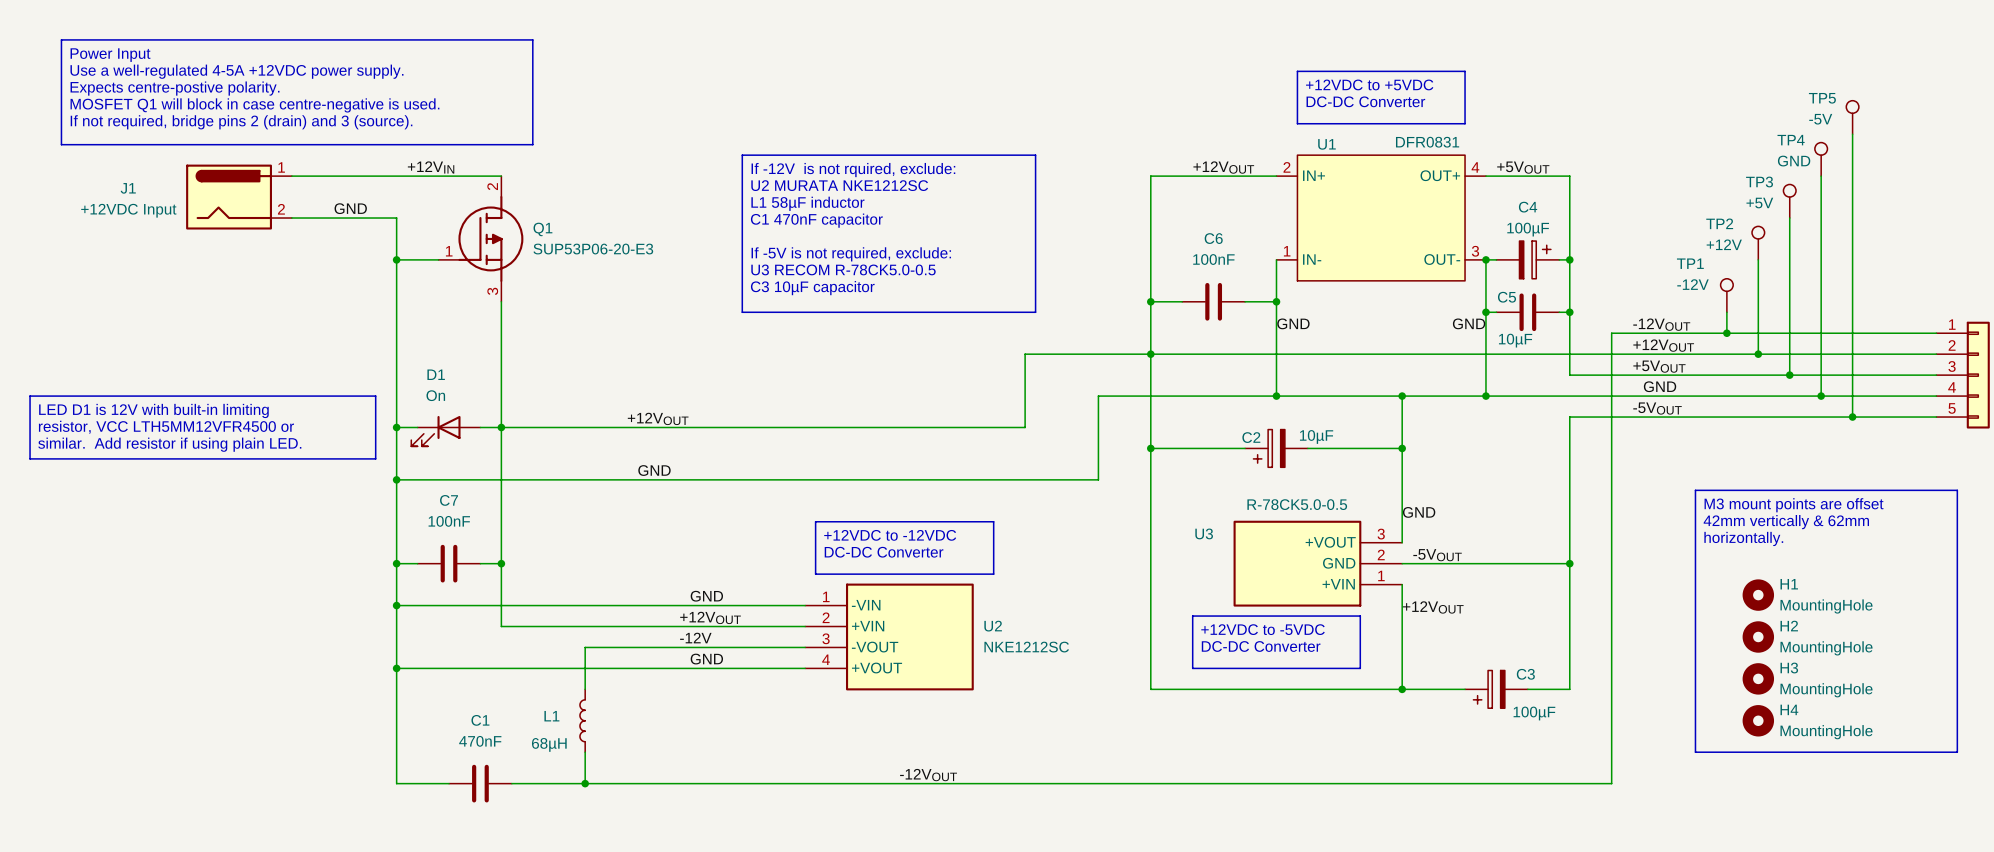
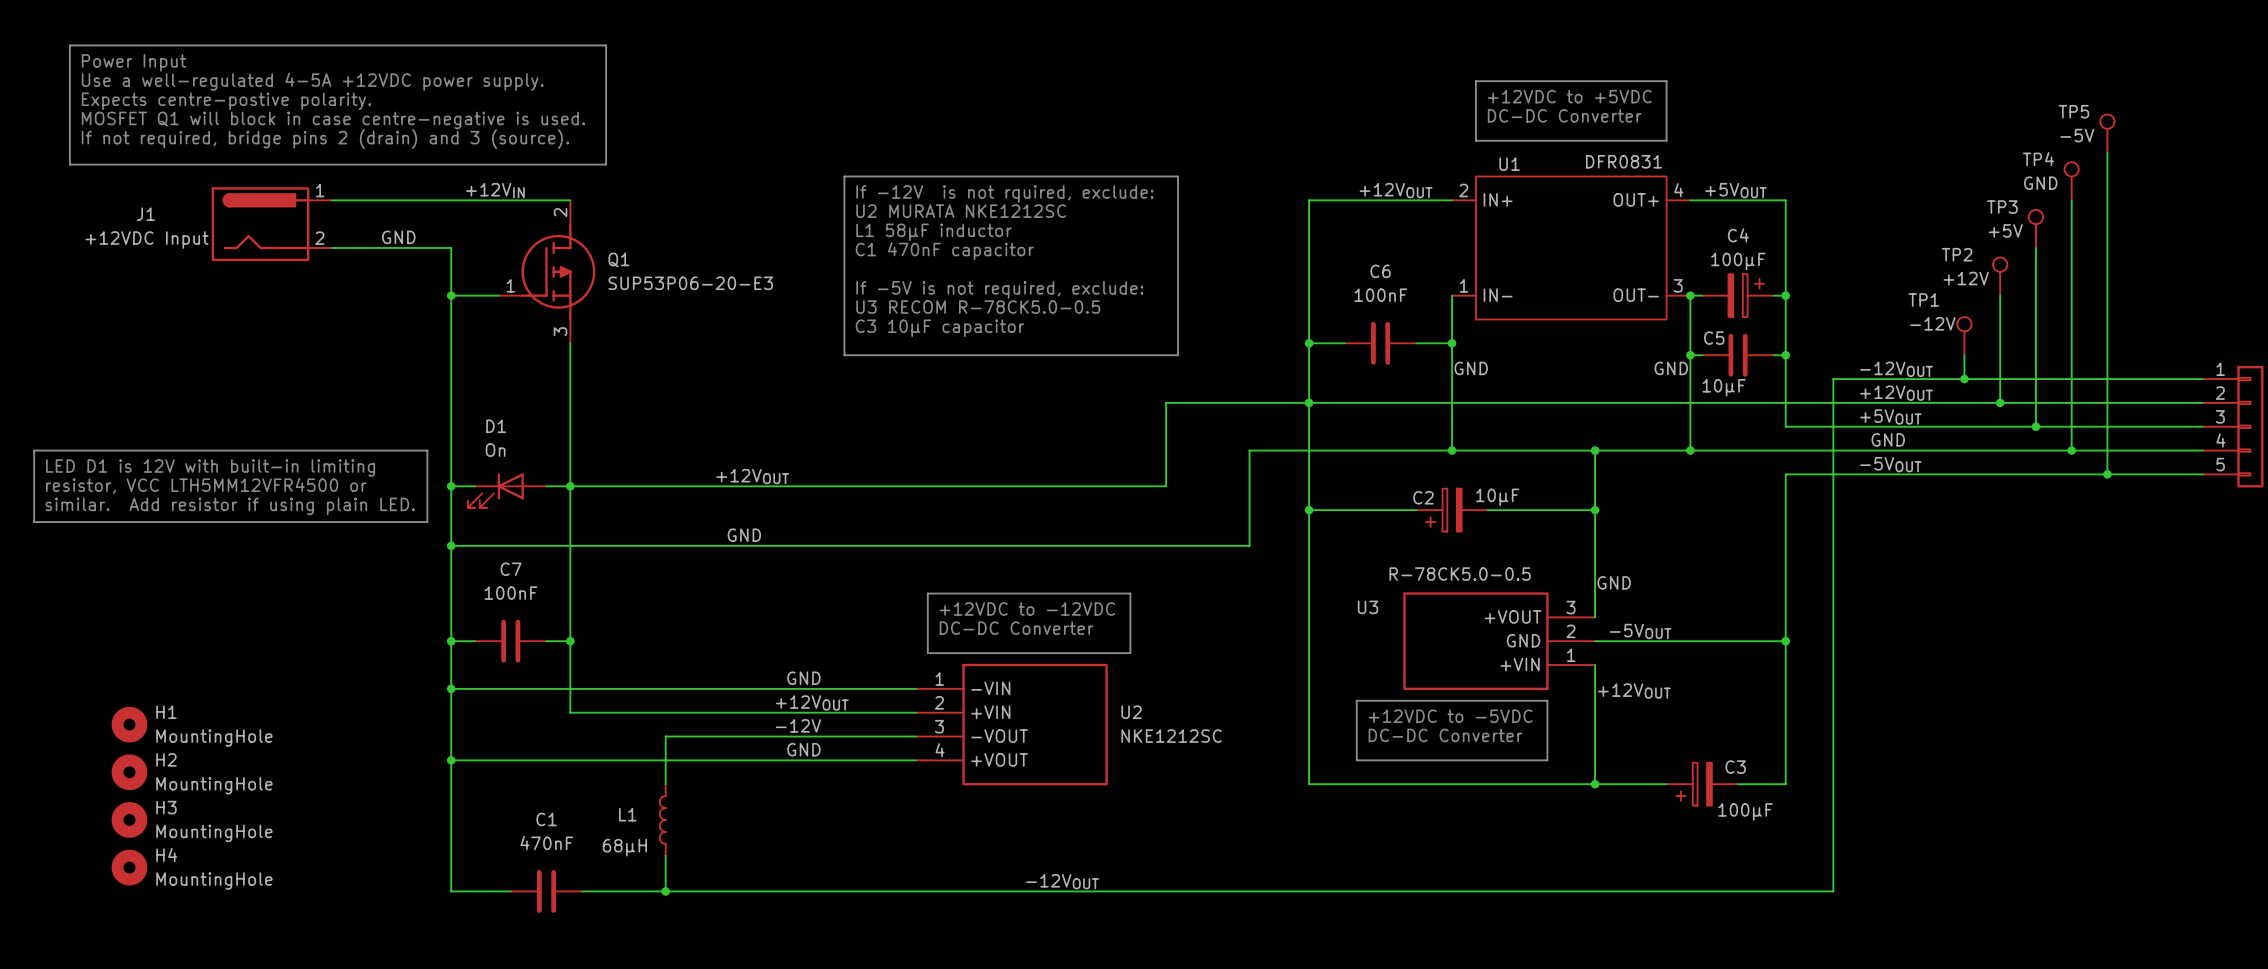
line: (1695, 490) (1957, 490) (1957, 752) (1695, 752) (1695, 490) -> none
text: M3 mount points are offset (1794, 505) -> none
text: 42mm vertically & 62mm (1786, 522) -> none
text: horizontally. (1743, 538) -> none
H1 position: (1758, 595) -> (129, 724)
H2 position: (1758, 636) -> (129, 772)
H3 position: (1758, 678) -> (129, 819)
H4 position: (1758, 720) -> (129, 867)

